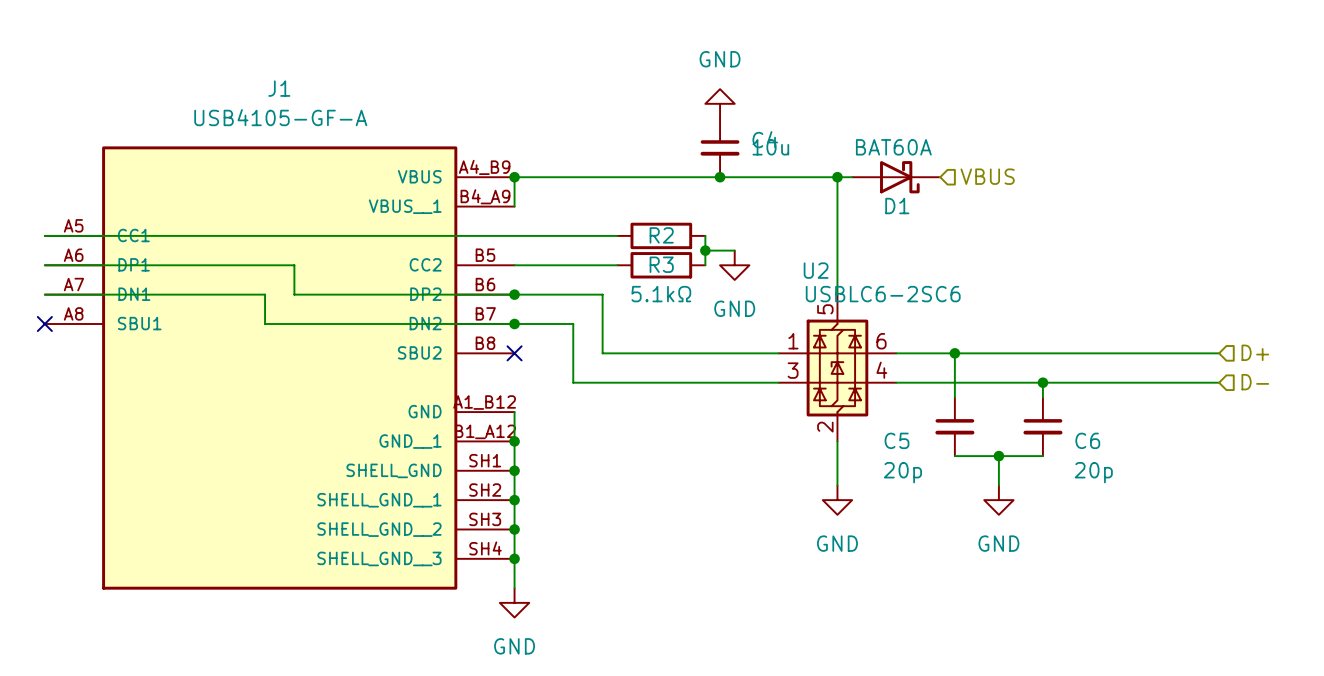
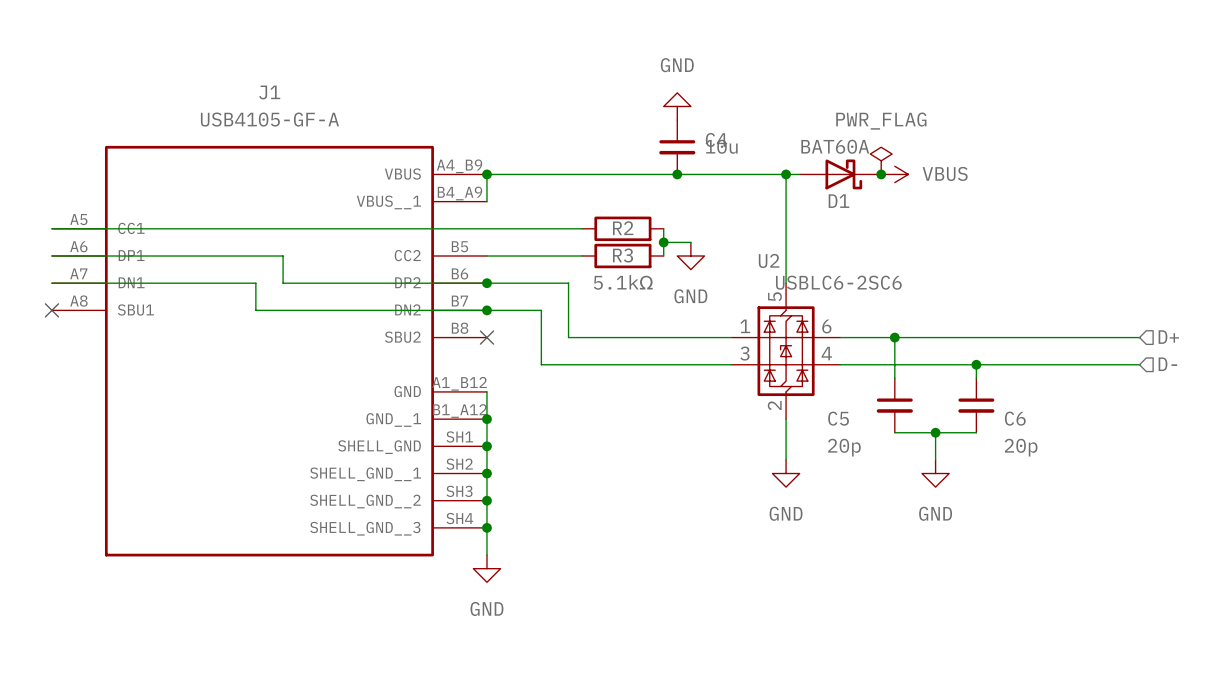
power symbol: none -> PWR_FLAG (881, 160)
hierarchical label: VBUS (987, 176) -> none
junction: none -> (881, 174)
power symbol: none -> VBUS (894, 174)

